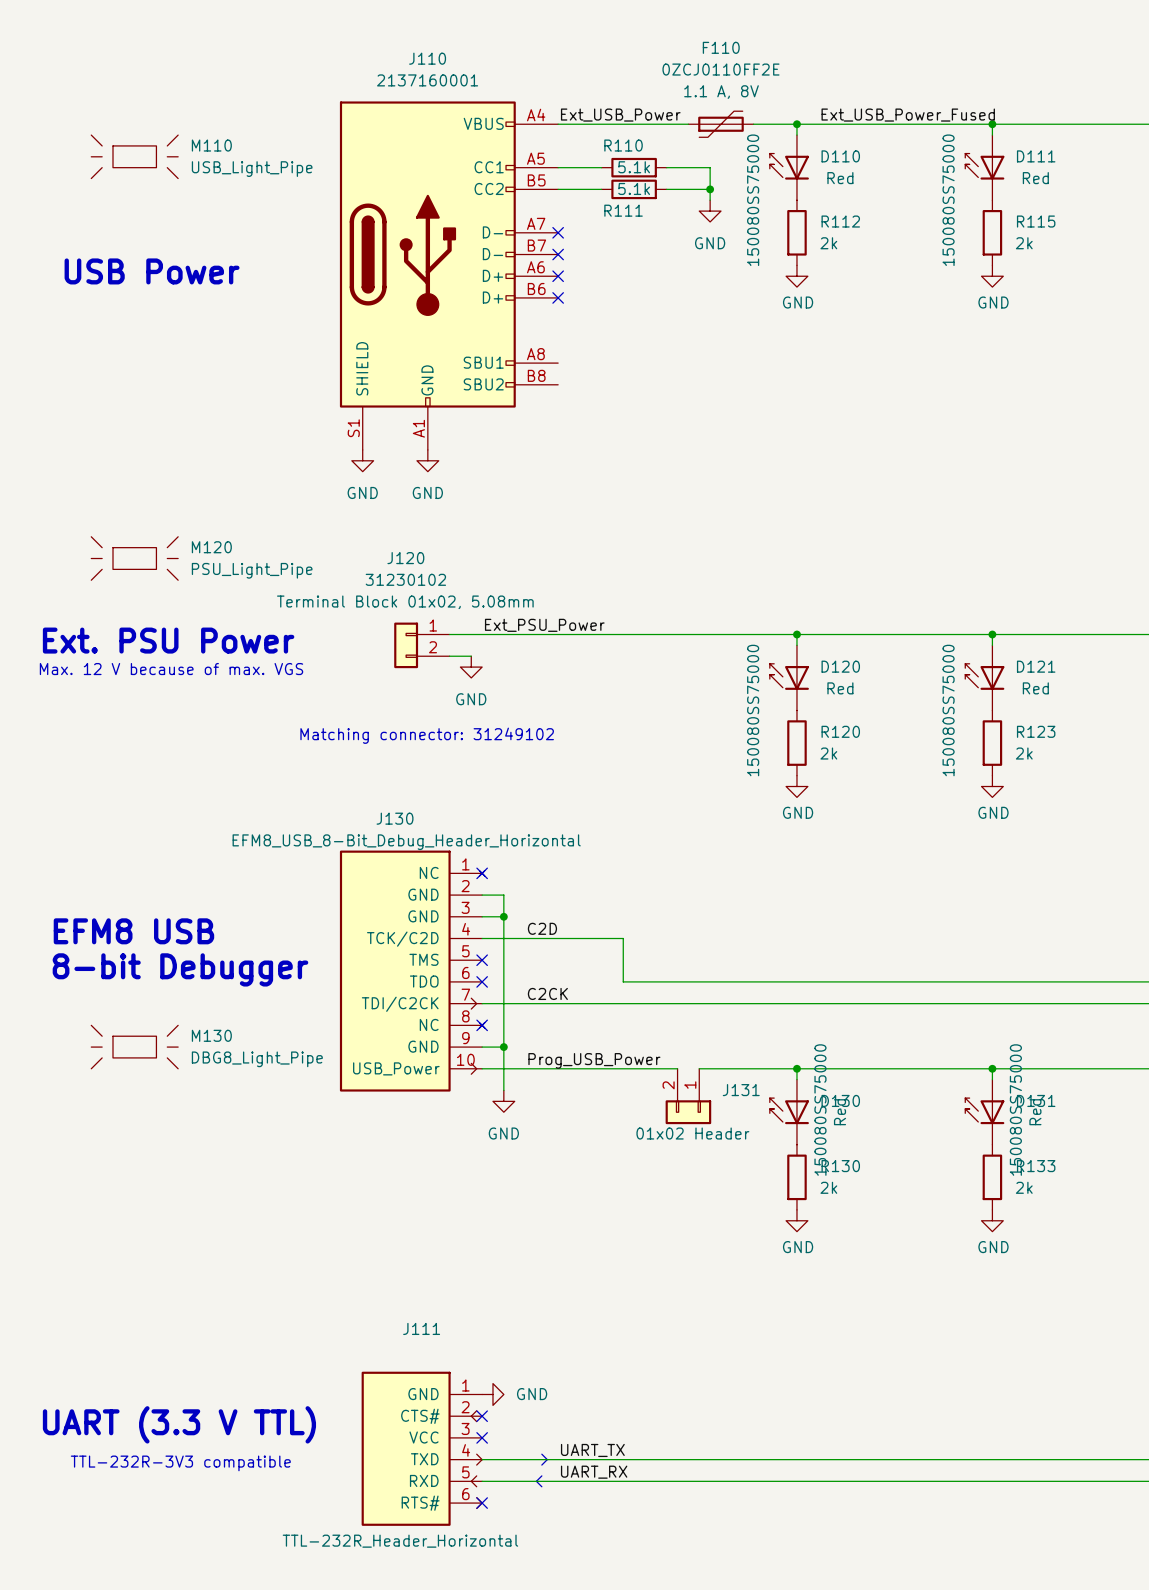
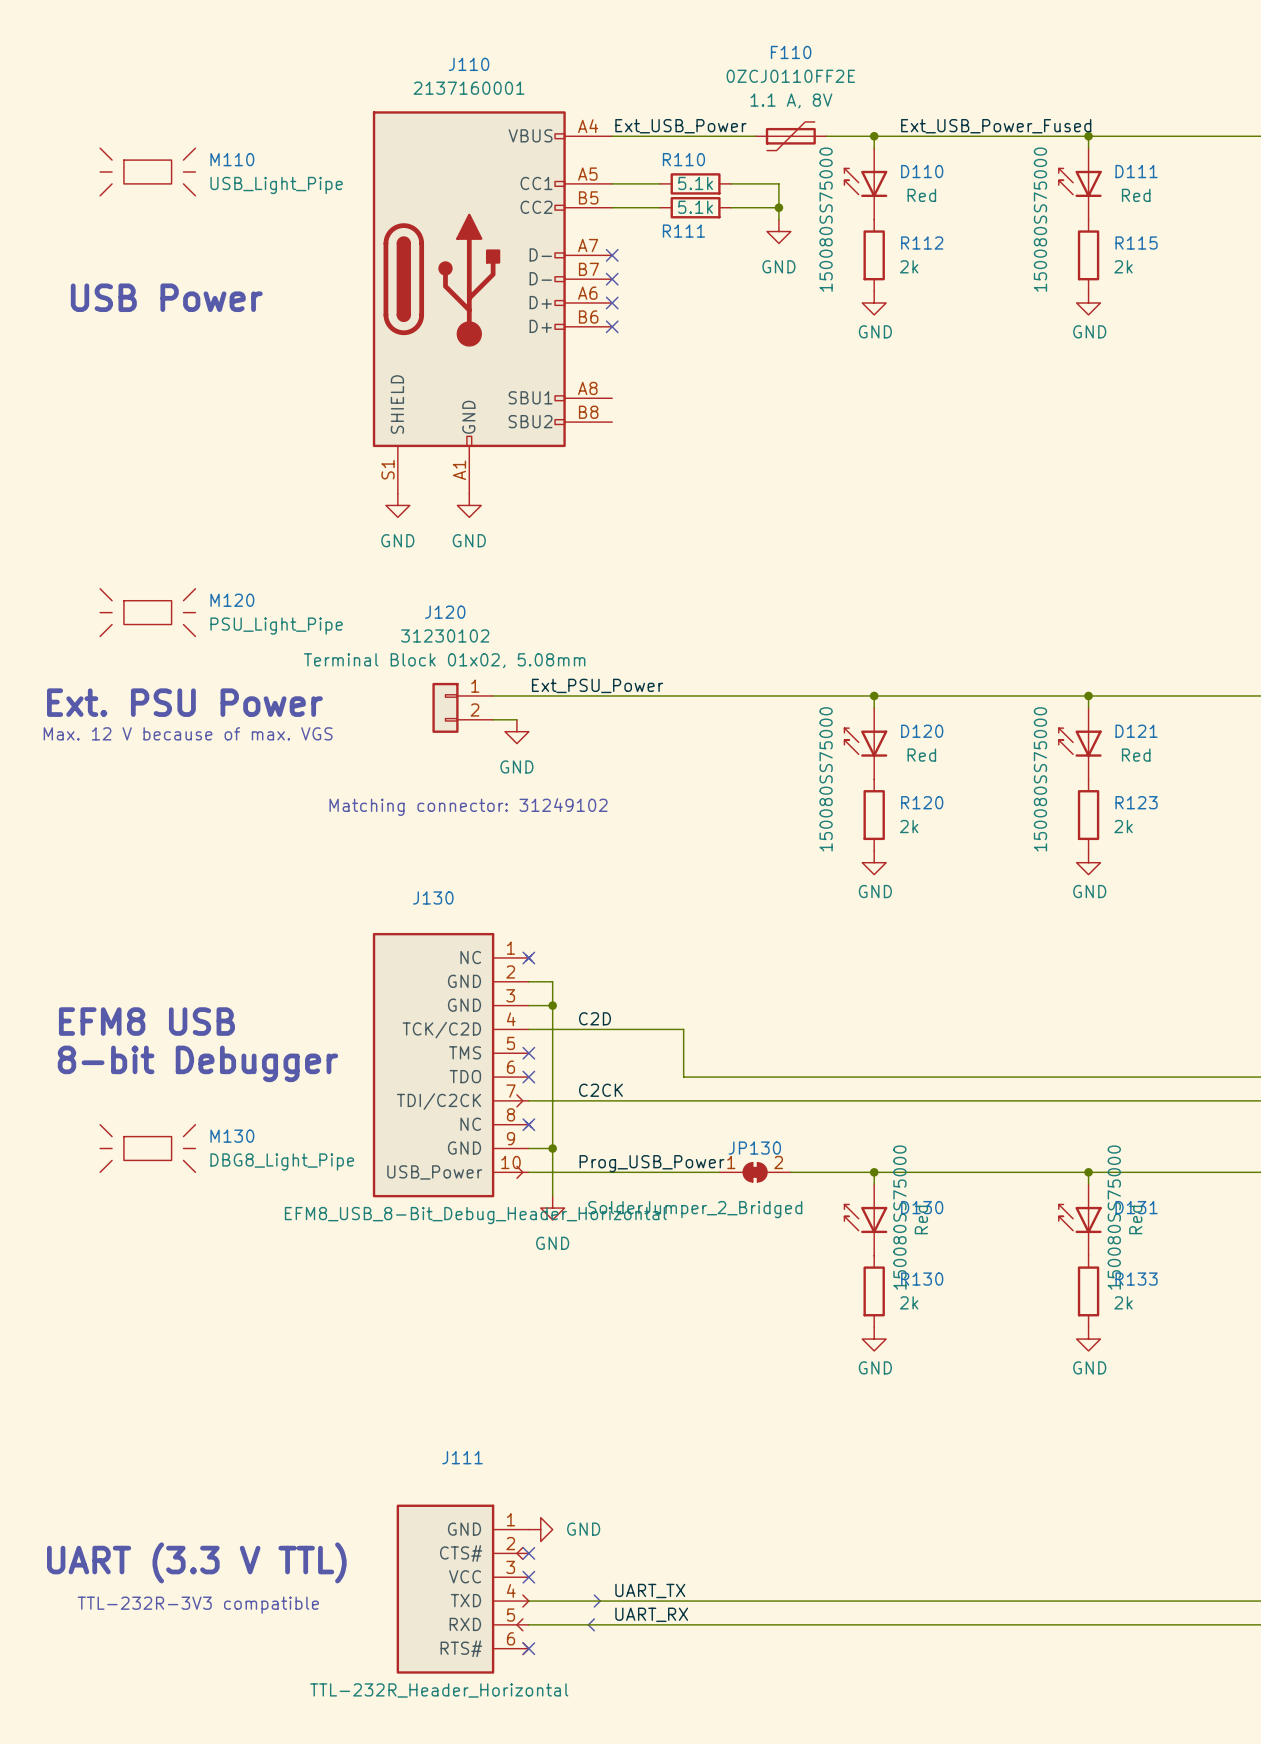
J130 value position: EFM8_USB_8-Bit_Debug_Header_Horizontal (406, 842) -> EFM8_USB_8-Bit_Debug_Header_Horizontal (475, 1215)
JP130: none -> SolderJumper_2_Bridged (755, 1172)
J131: (688, 1096) -> none

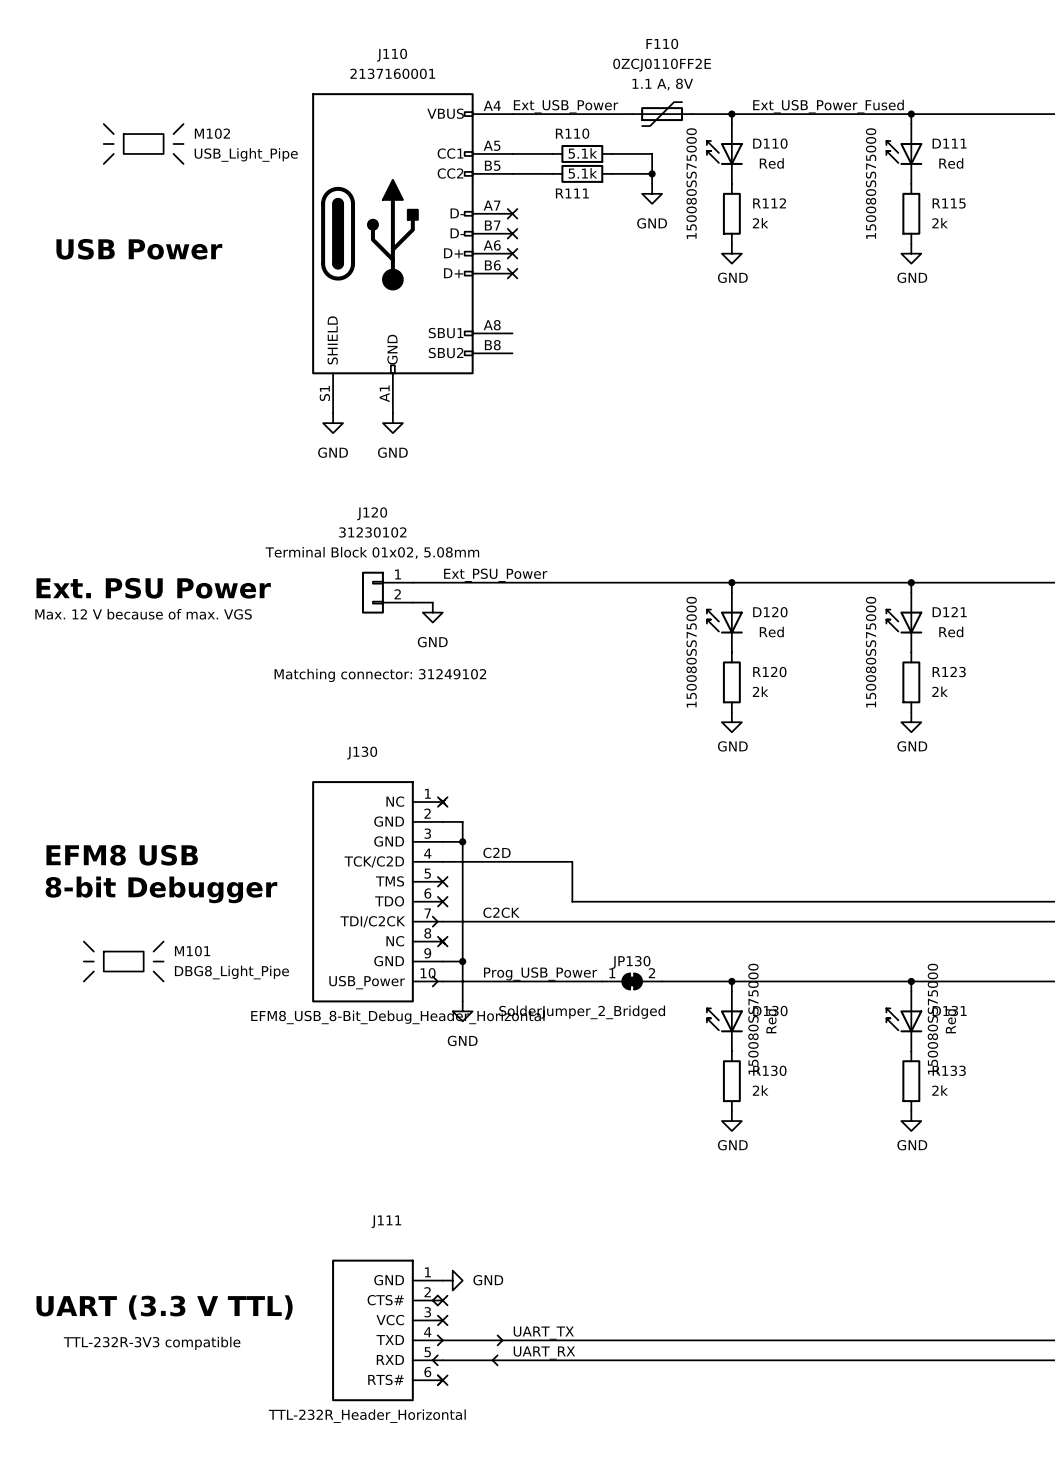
M110: USB_Light_Pipe (147, 172) -> none
M102: none -> USB_Light_Pipe (143, 144)
M120: PSU_Light_Pipe (147, 612) -> none
M130 name: M130 (232, 1136) -> M101 (192, 951)

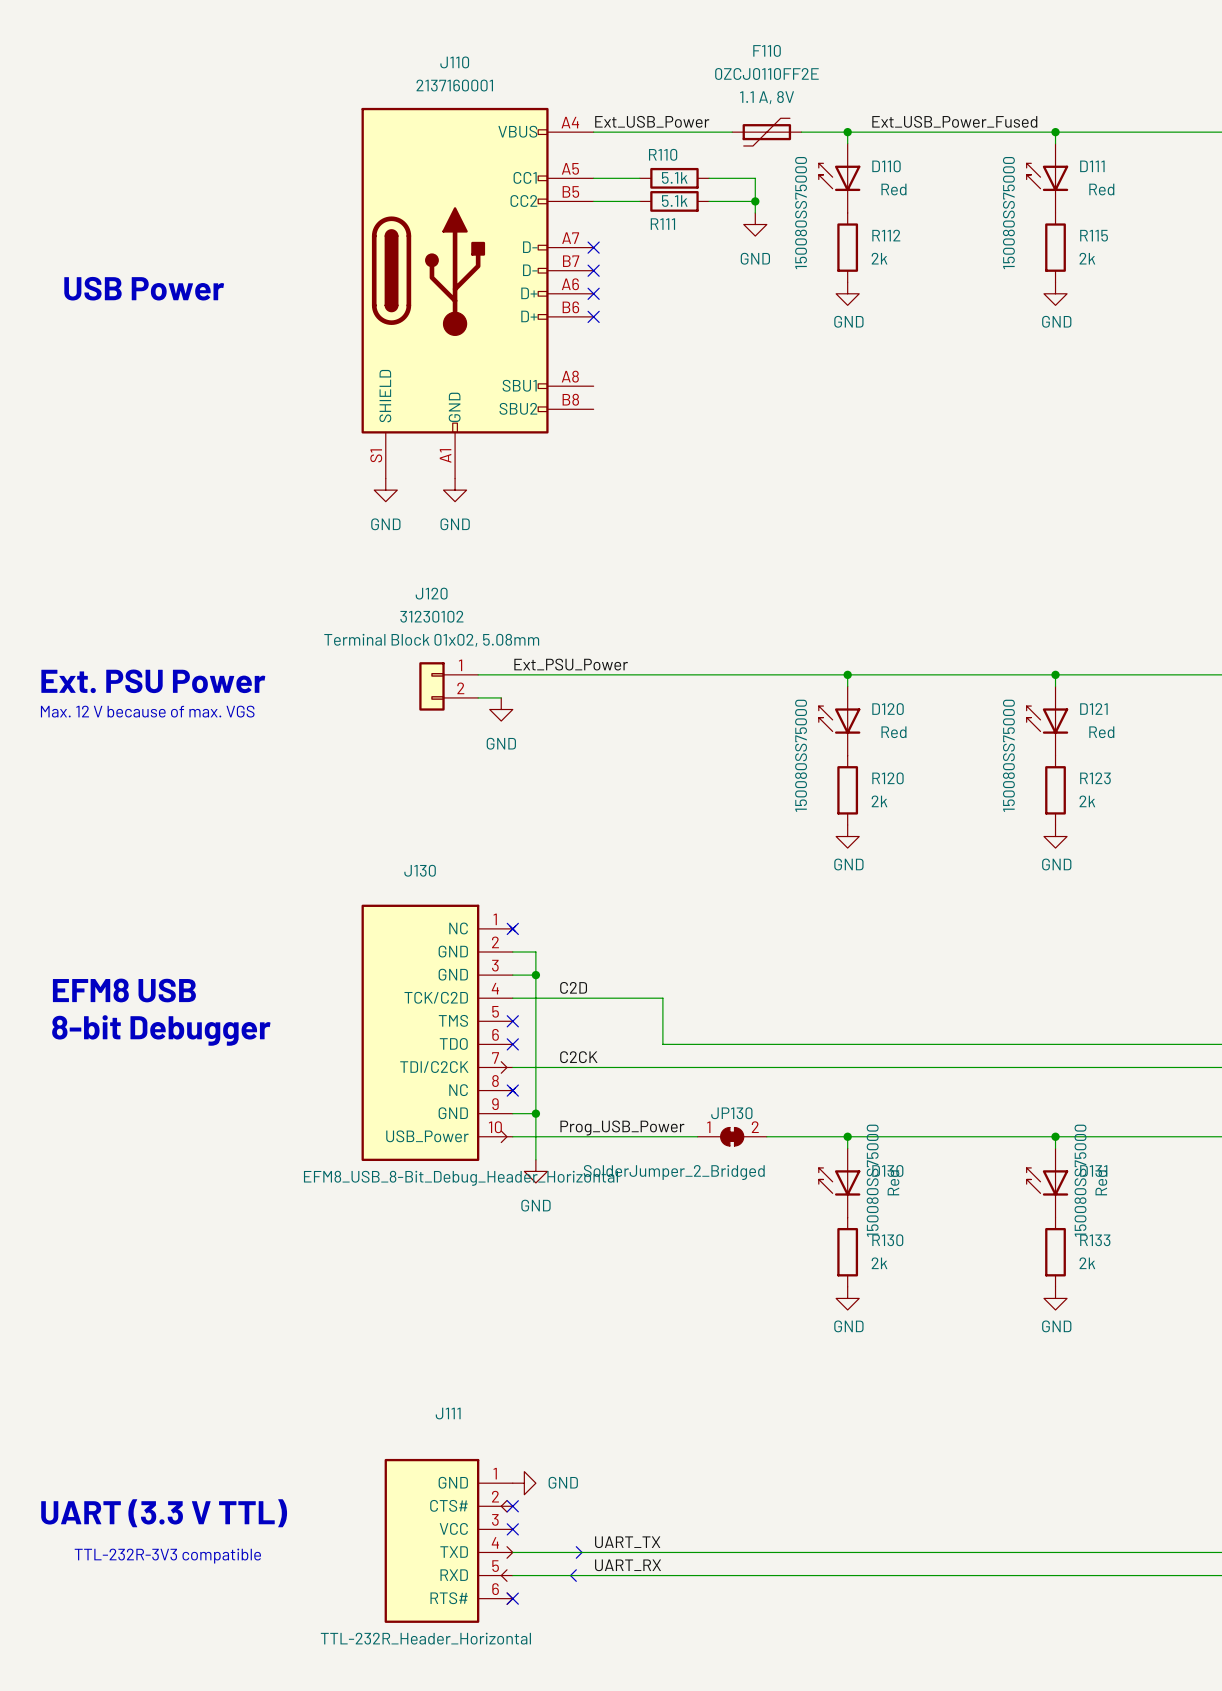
M102: USB_Light_Pipe (143, 144) -> none
text: Matching connector: 31249102 (380, 675) -> none
M101: DBG8_Light_Pipe (123, 961) -> none

